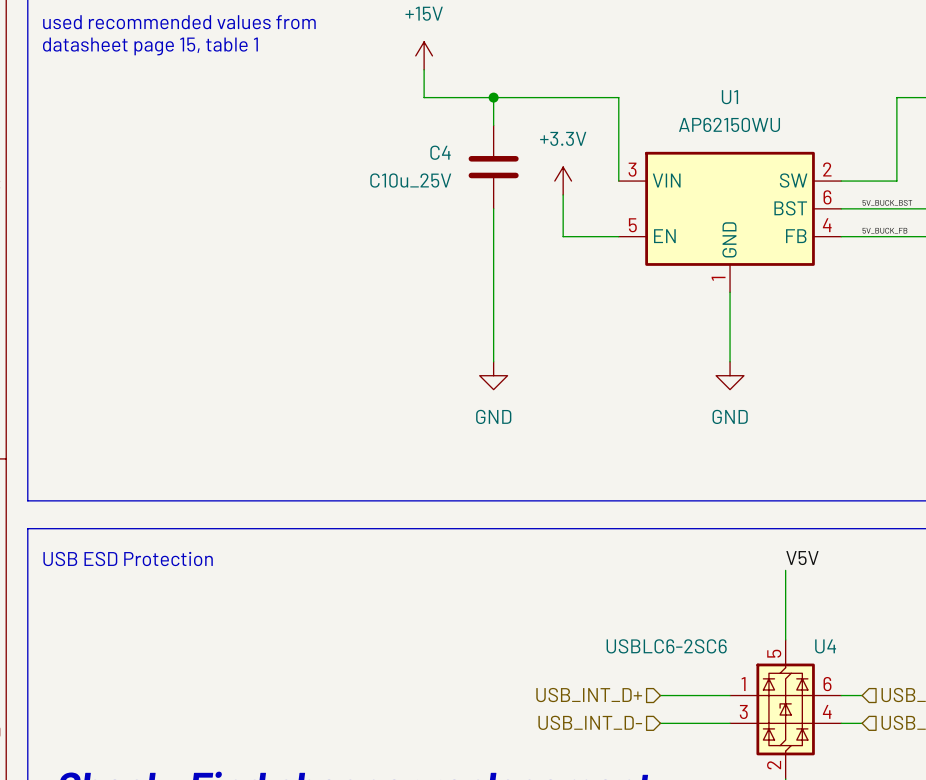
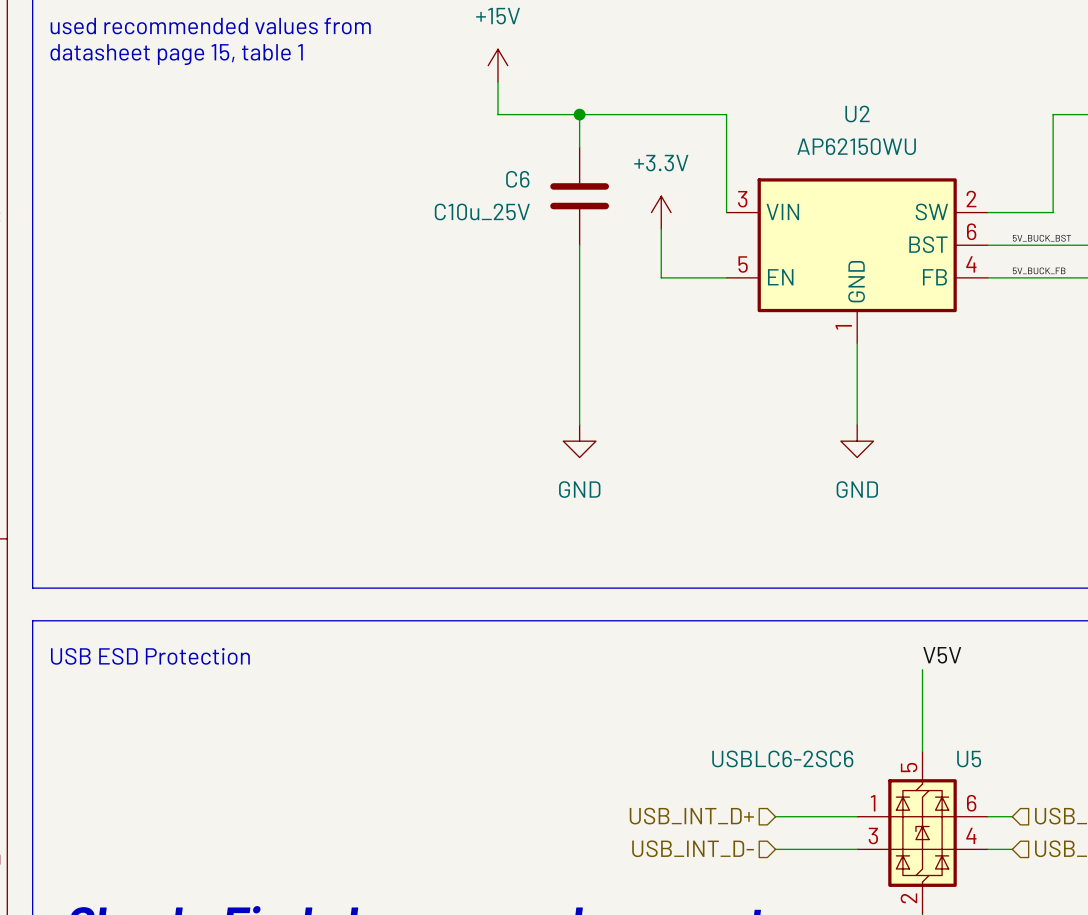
U1 name: U1 (729, 97) -> U2 (857, 114)
C4 name: C4 (440, 152) -> C6 (517, 179)
U4 name: U4 (825, 646) -> U5 (969, 759)

